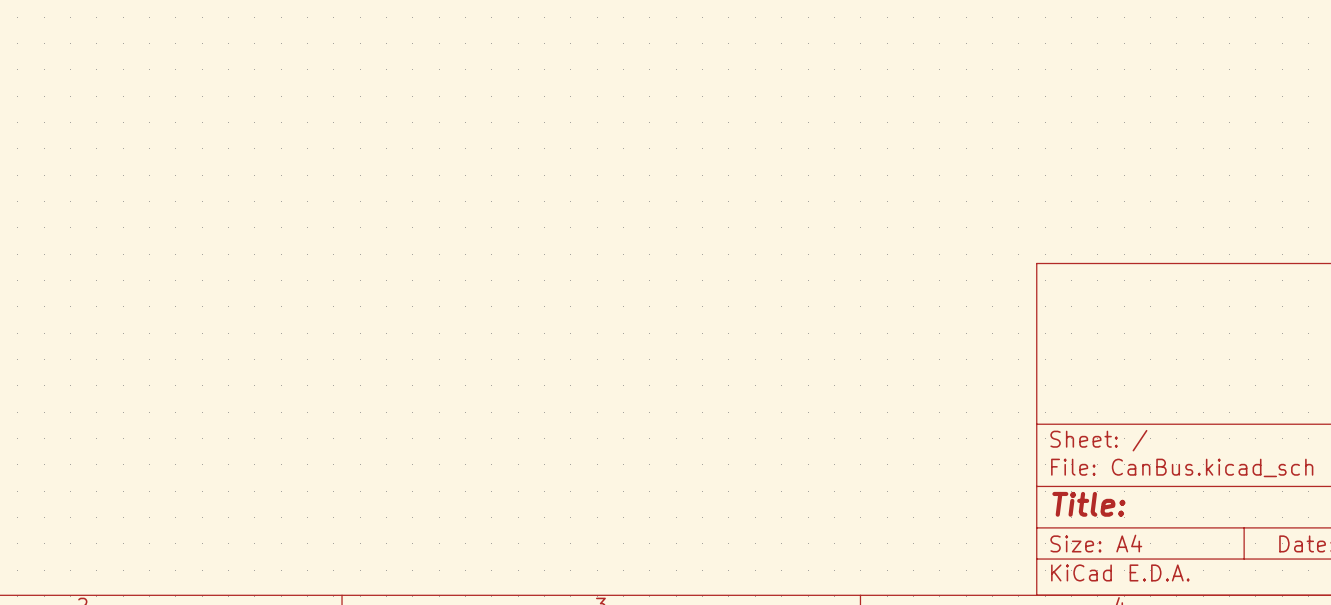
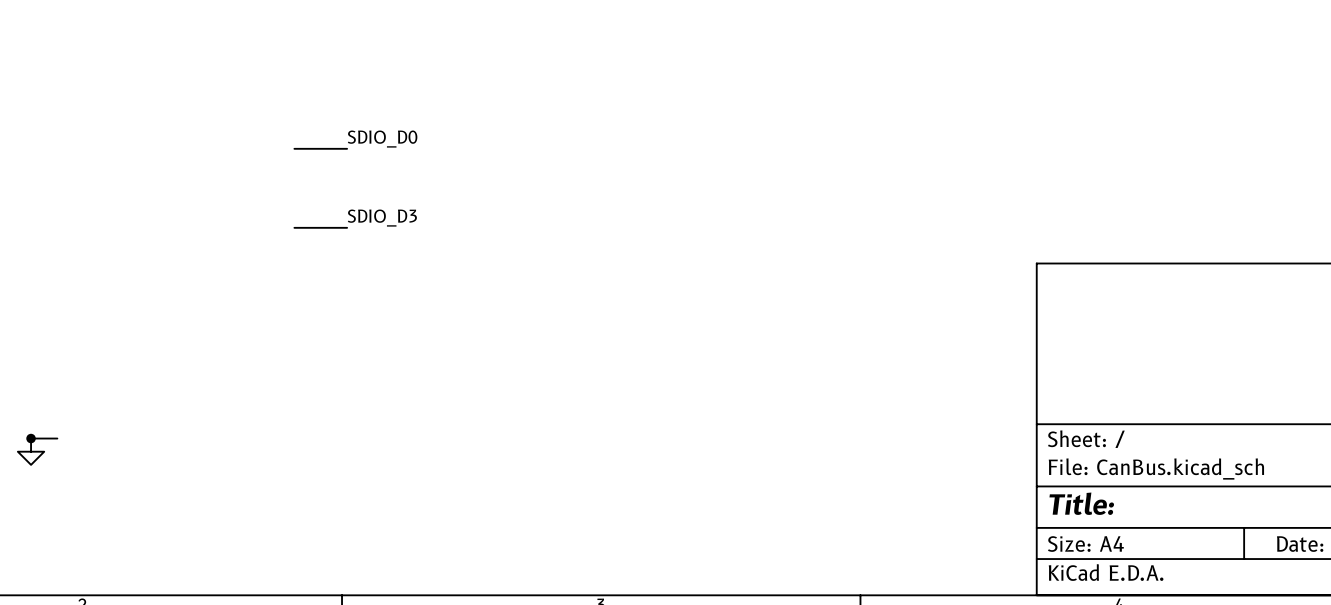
label: none -> SDIO_D0 (382, 139)
wire: none -> (294, 148) (347, 148)
label: none -> SDIO_D3 (382, 218)
wire: none -> (294, 227) (347, 227)
wire: none -> (31, 438) (57, 438)
junction: none -> (31, 438)
power symbol: none -> (31, 451)

